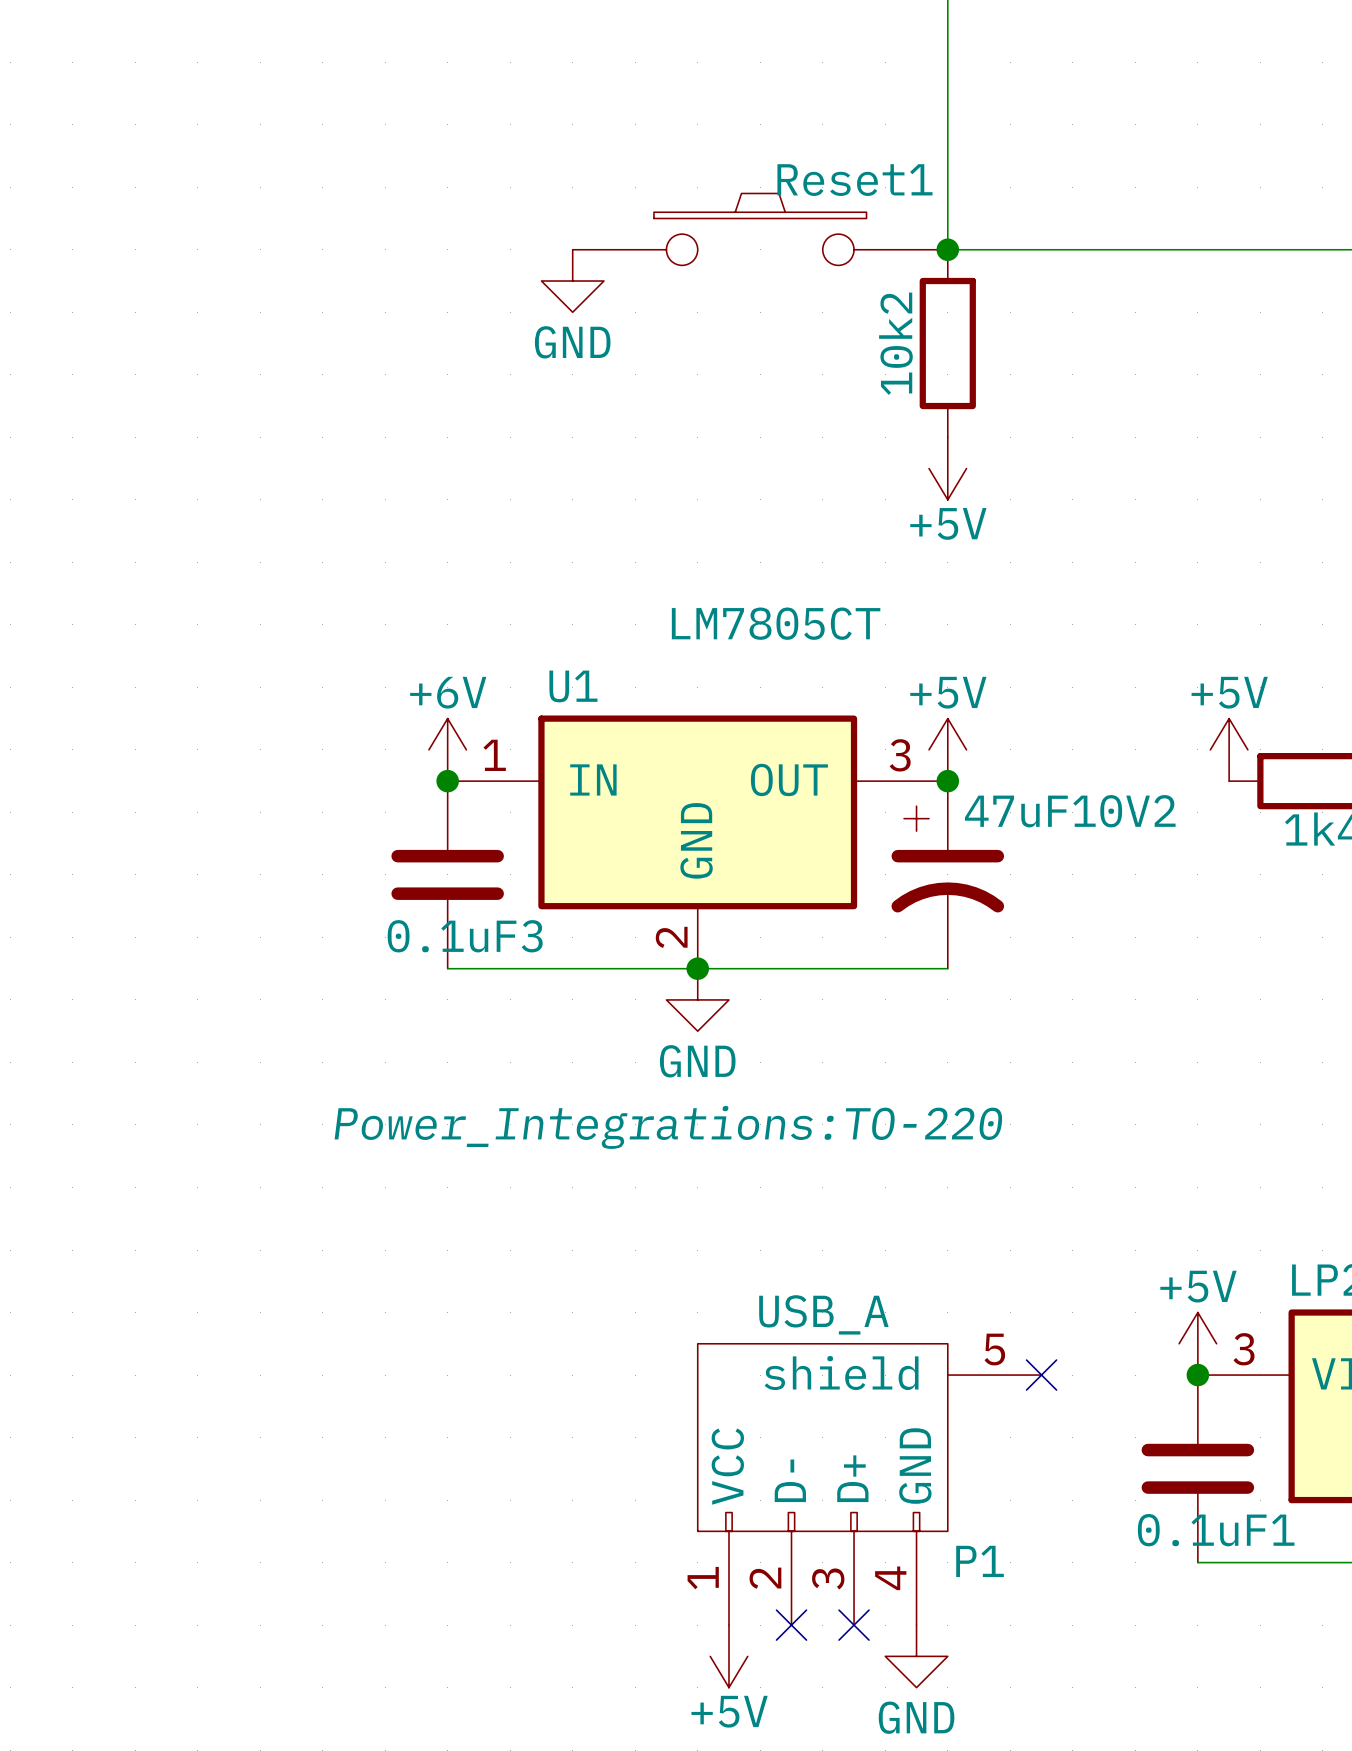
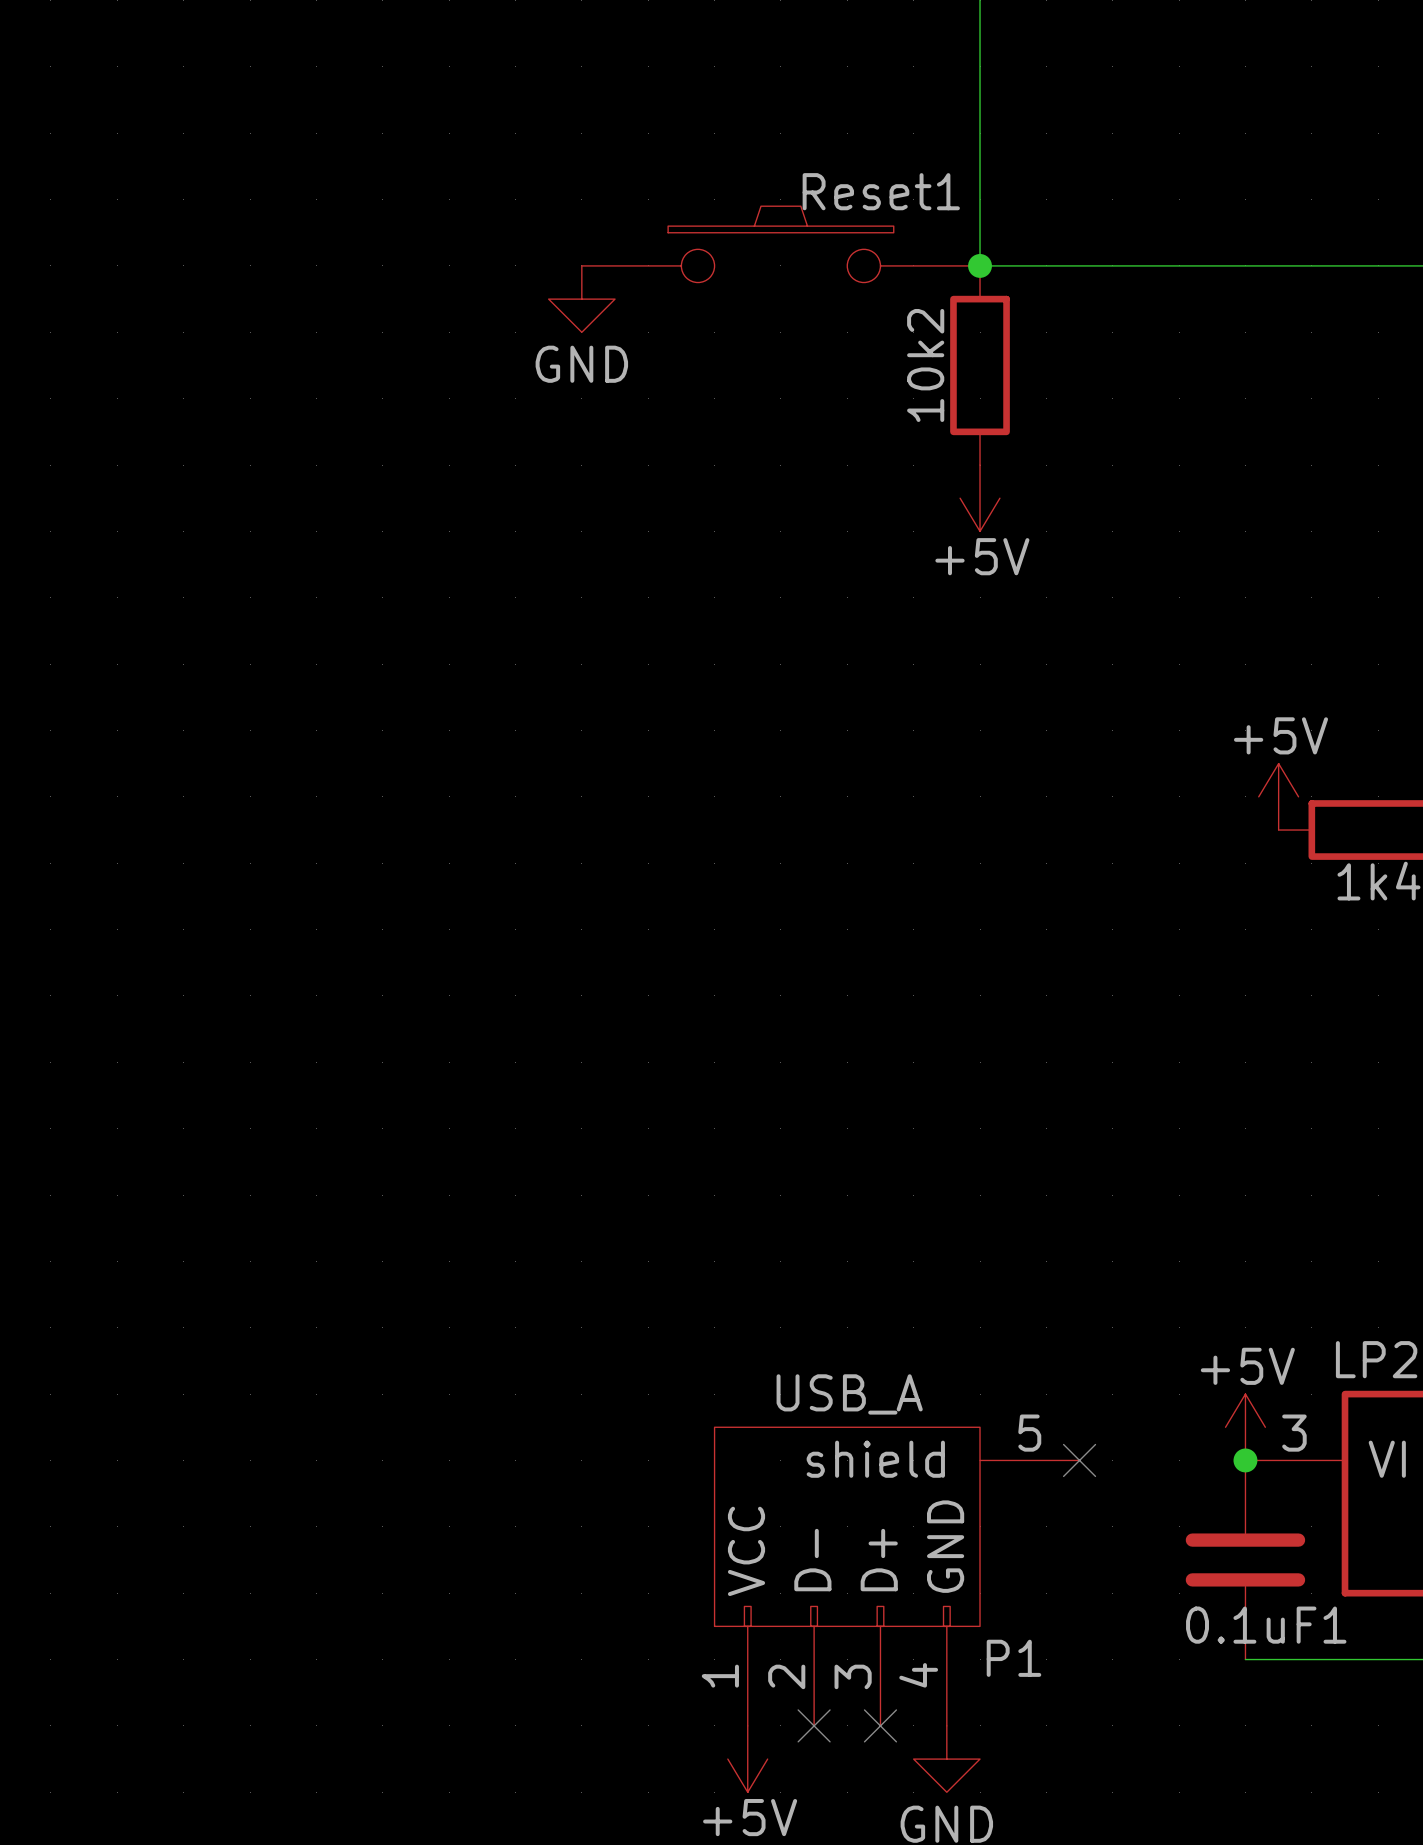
power symbol: +6V (447, 749) -> none
power symbol: +5V (947, 749) -> none
junction: (447, 781) -> none
junction: (947, 781) -> none
U1: LM7805CT (697, 842) -> none
0.1uF3: (447, 874) -> none
47uF10V2: (947, 874) -> none
wire: (447, 968) (947, 968) -> none
junction: (697, 968) -> none
power symbol: GND (697, 999) -> none

